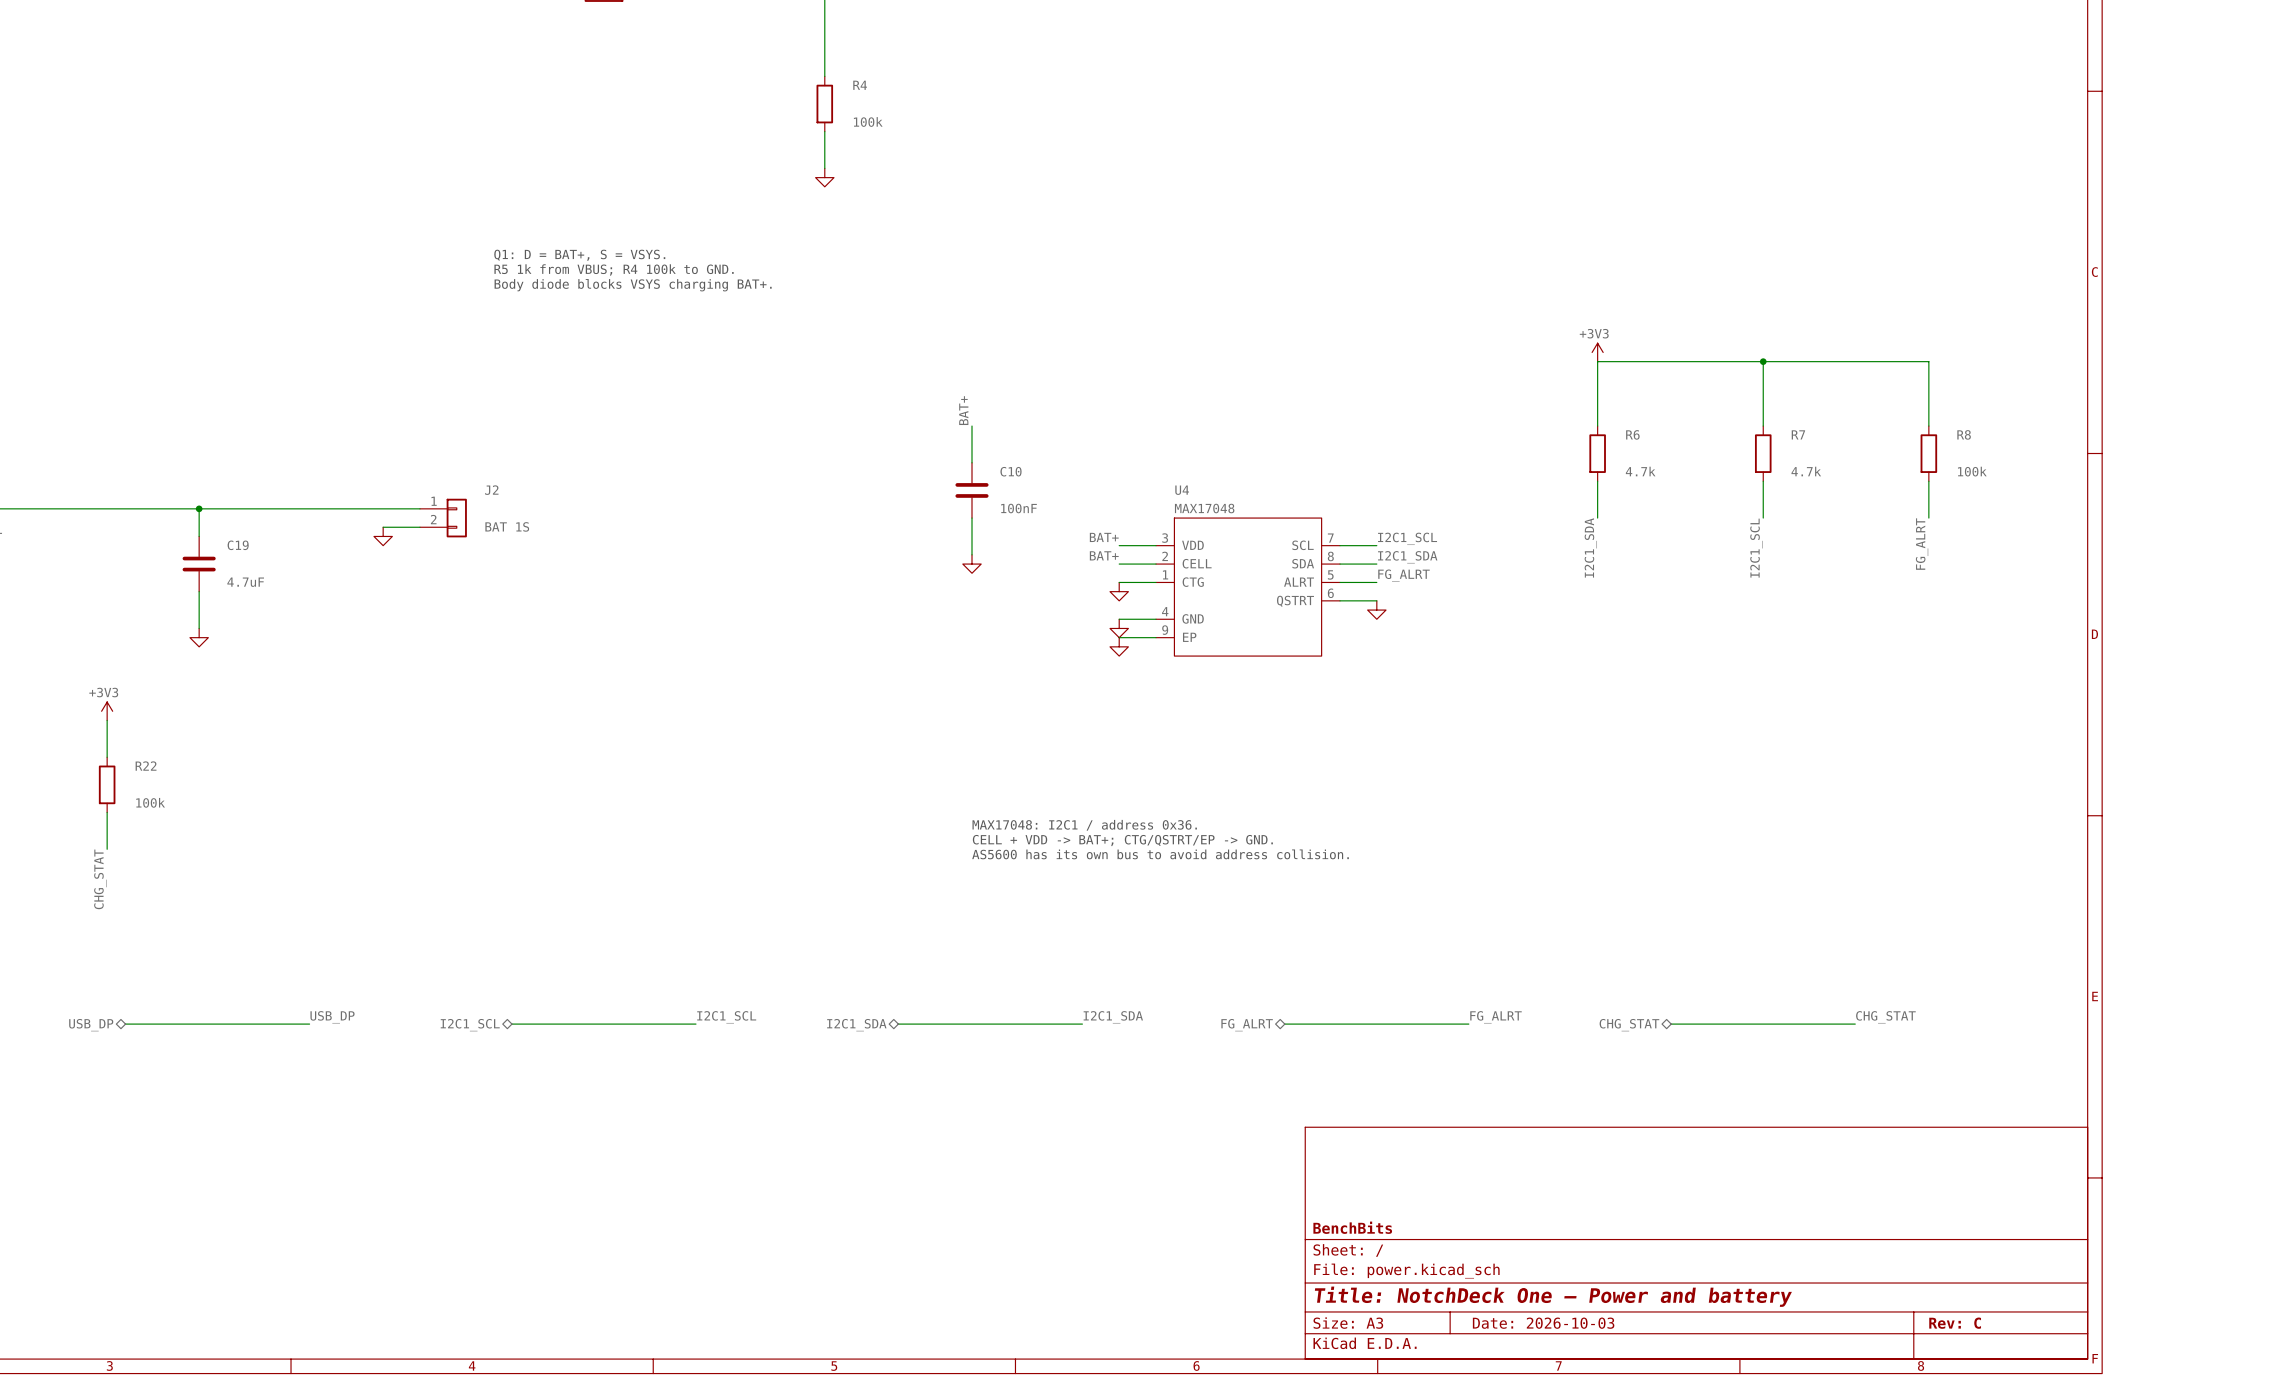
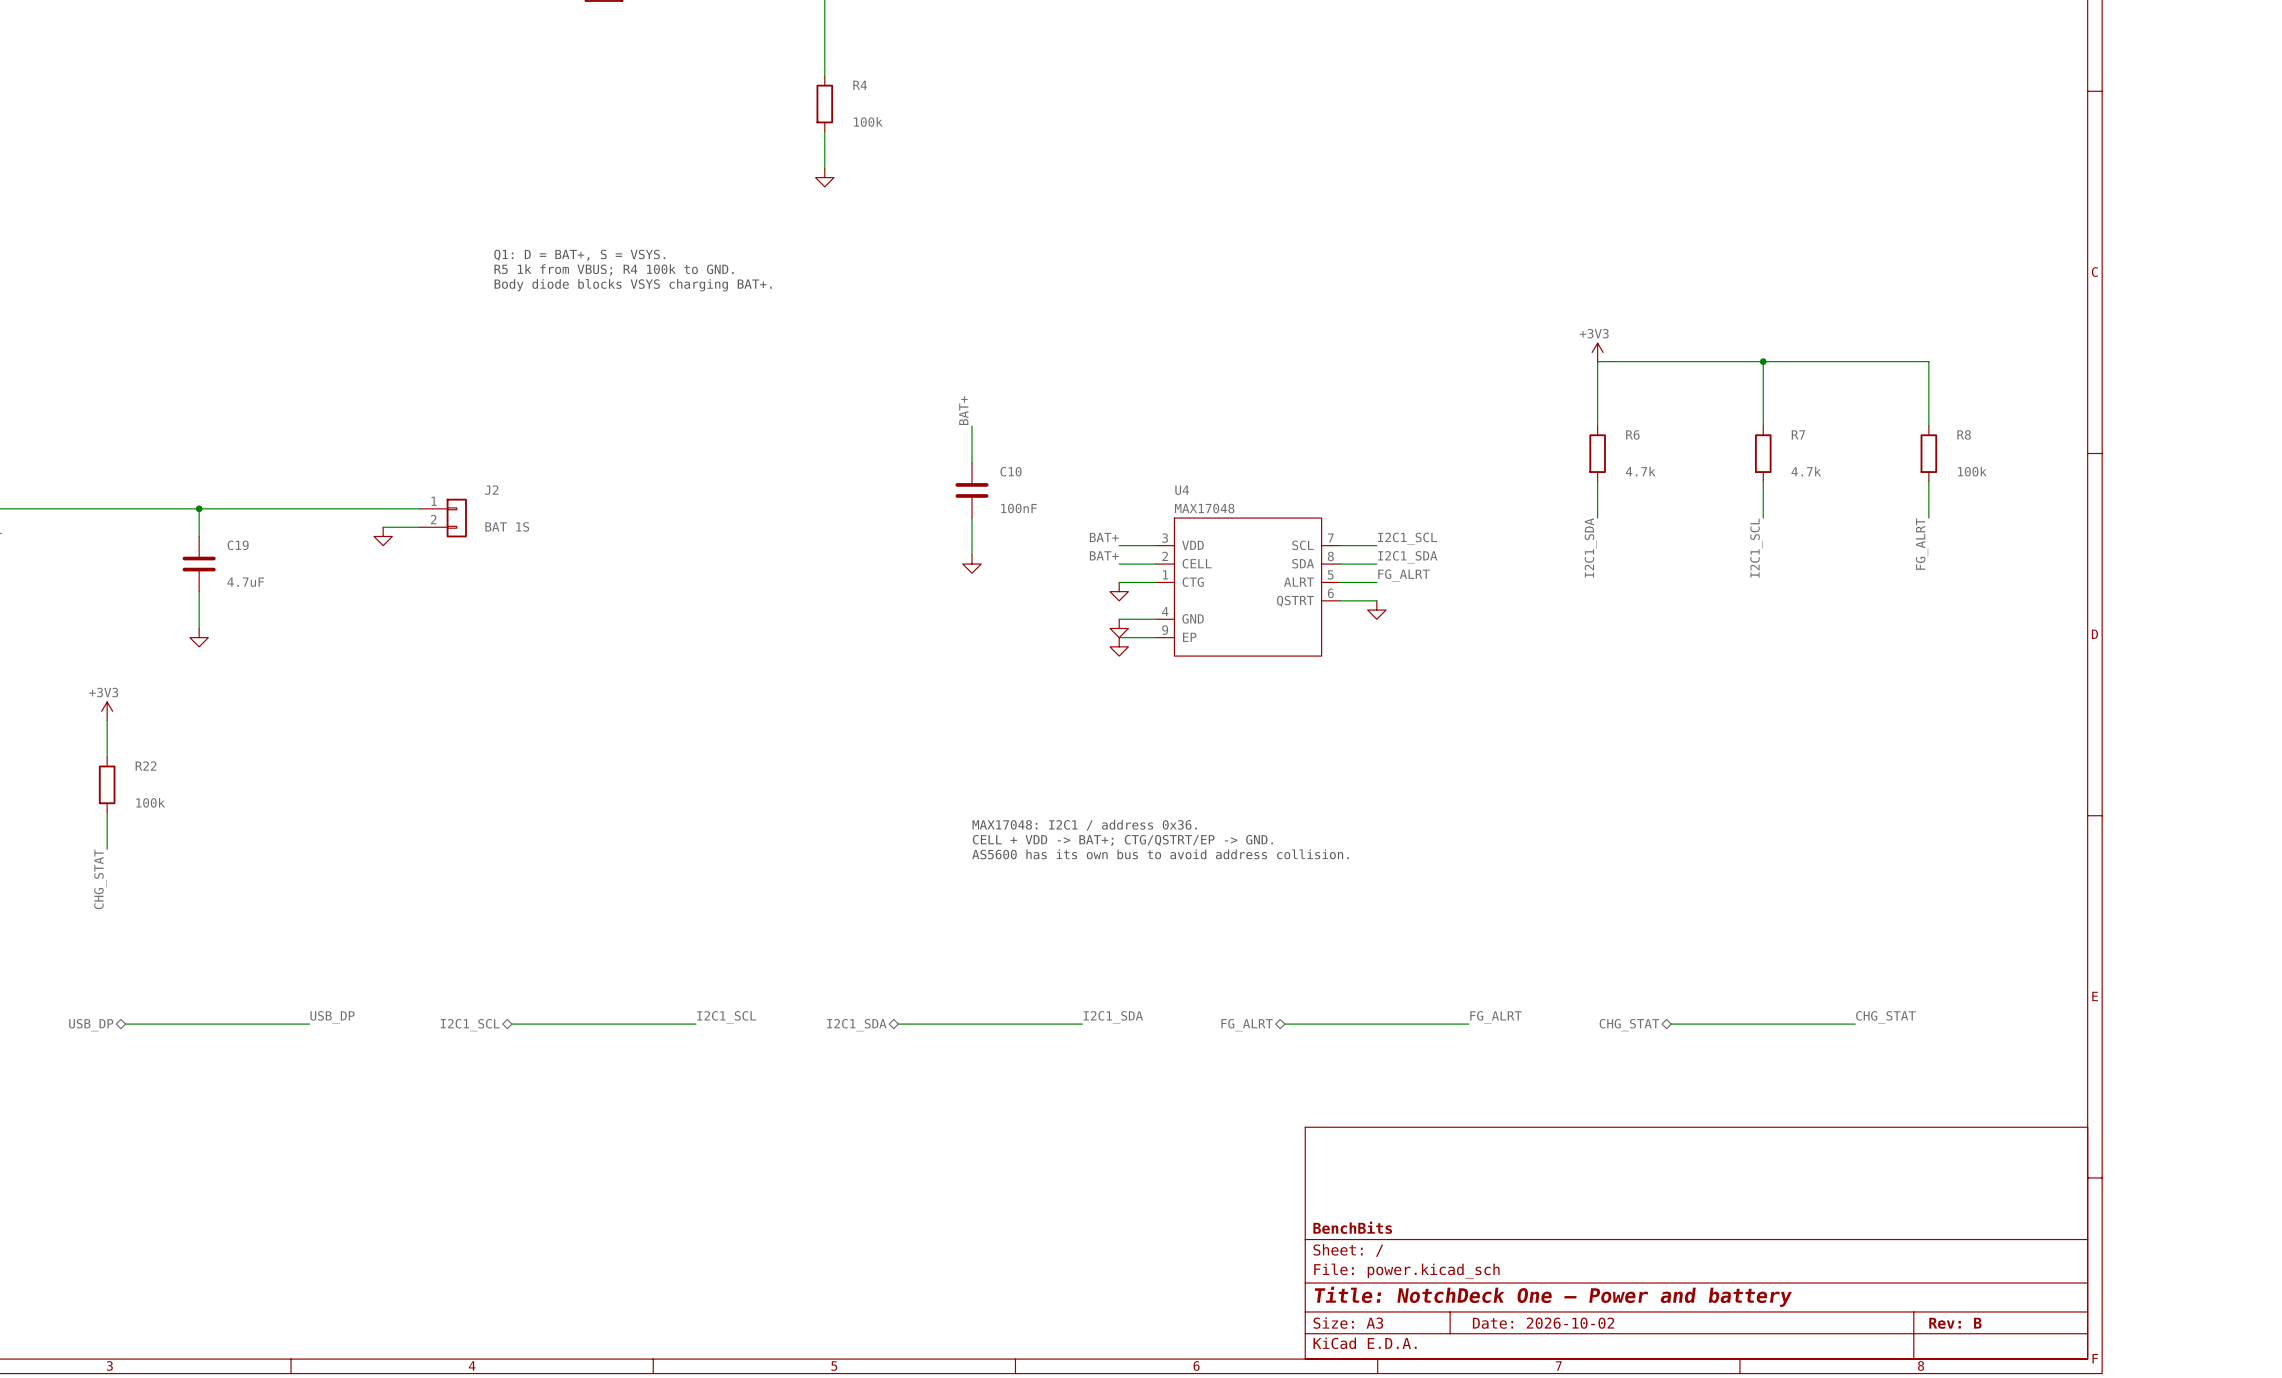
title block: Date: 2026-10-03 (1543, 1323) -> Date: 2026-10-02 (1543, 1323)
title block: Rev: C (1955, 1323) -> Rev: B (1955, 1323)

